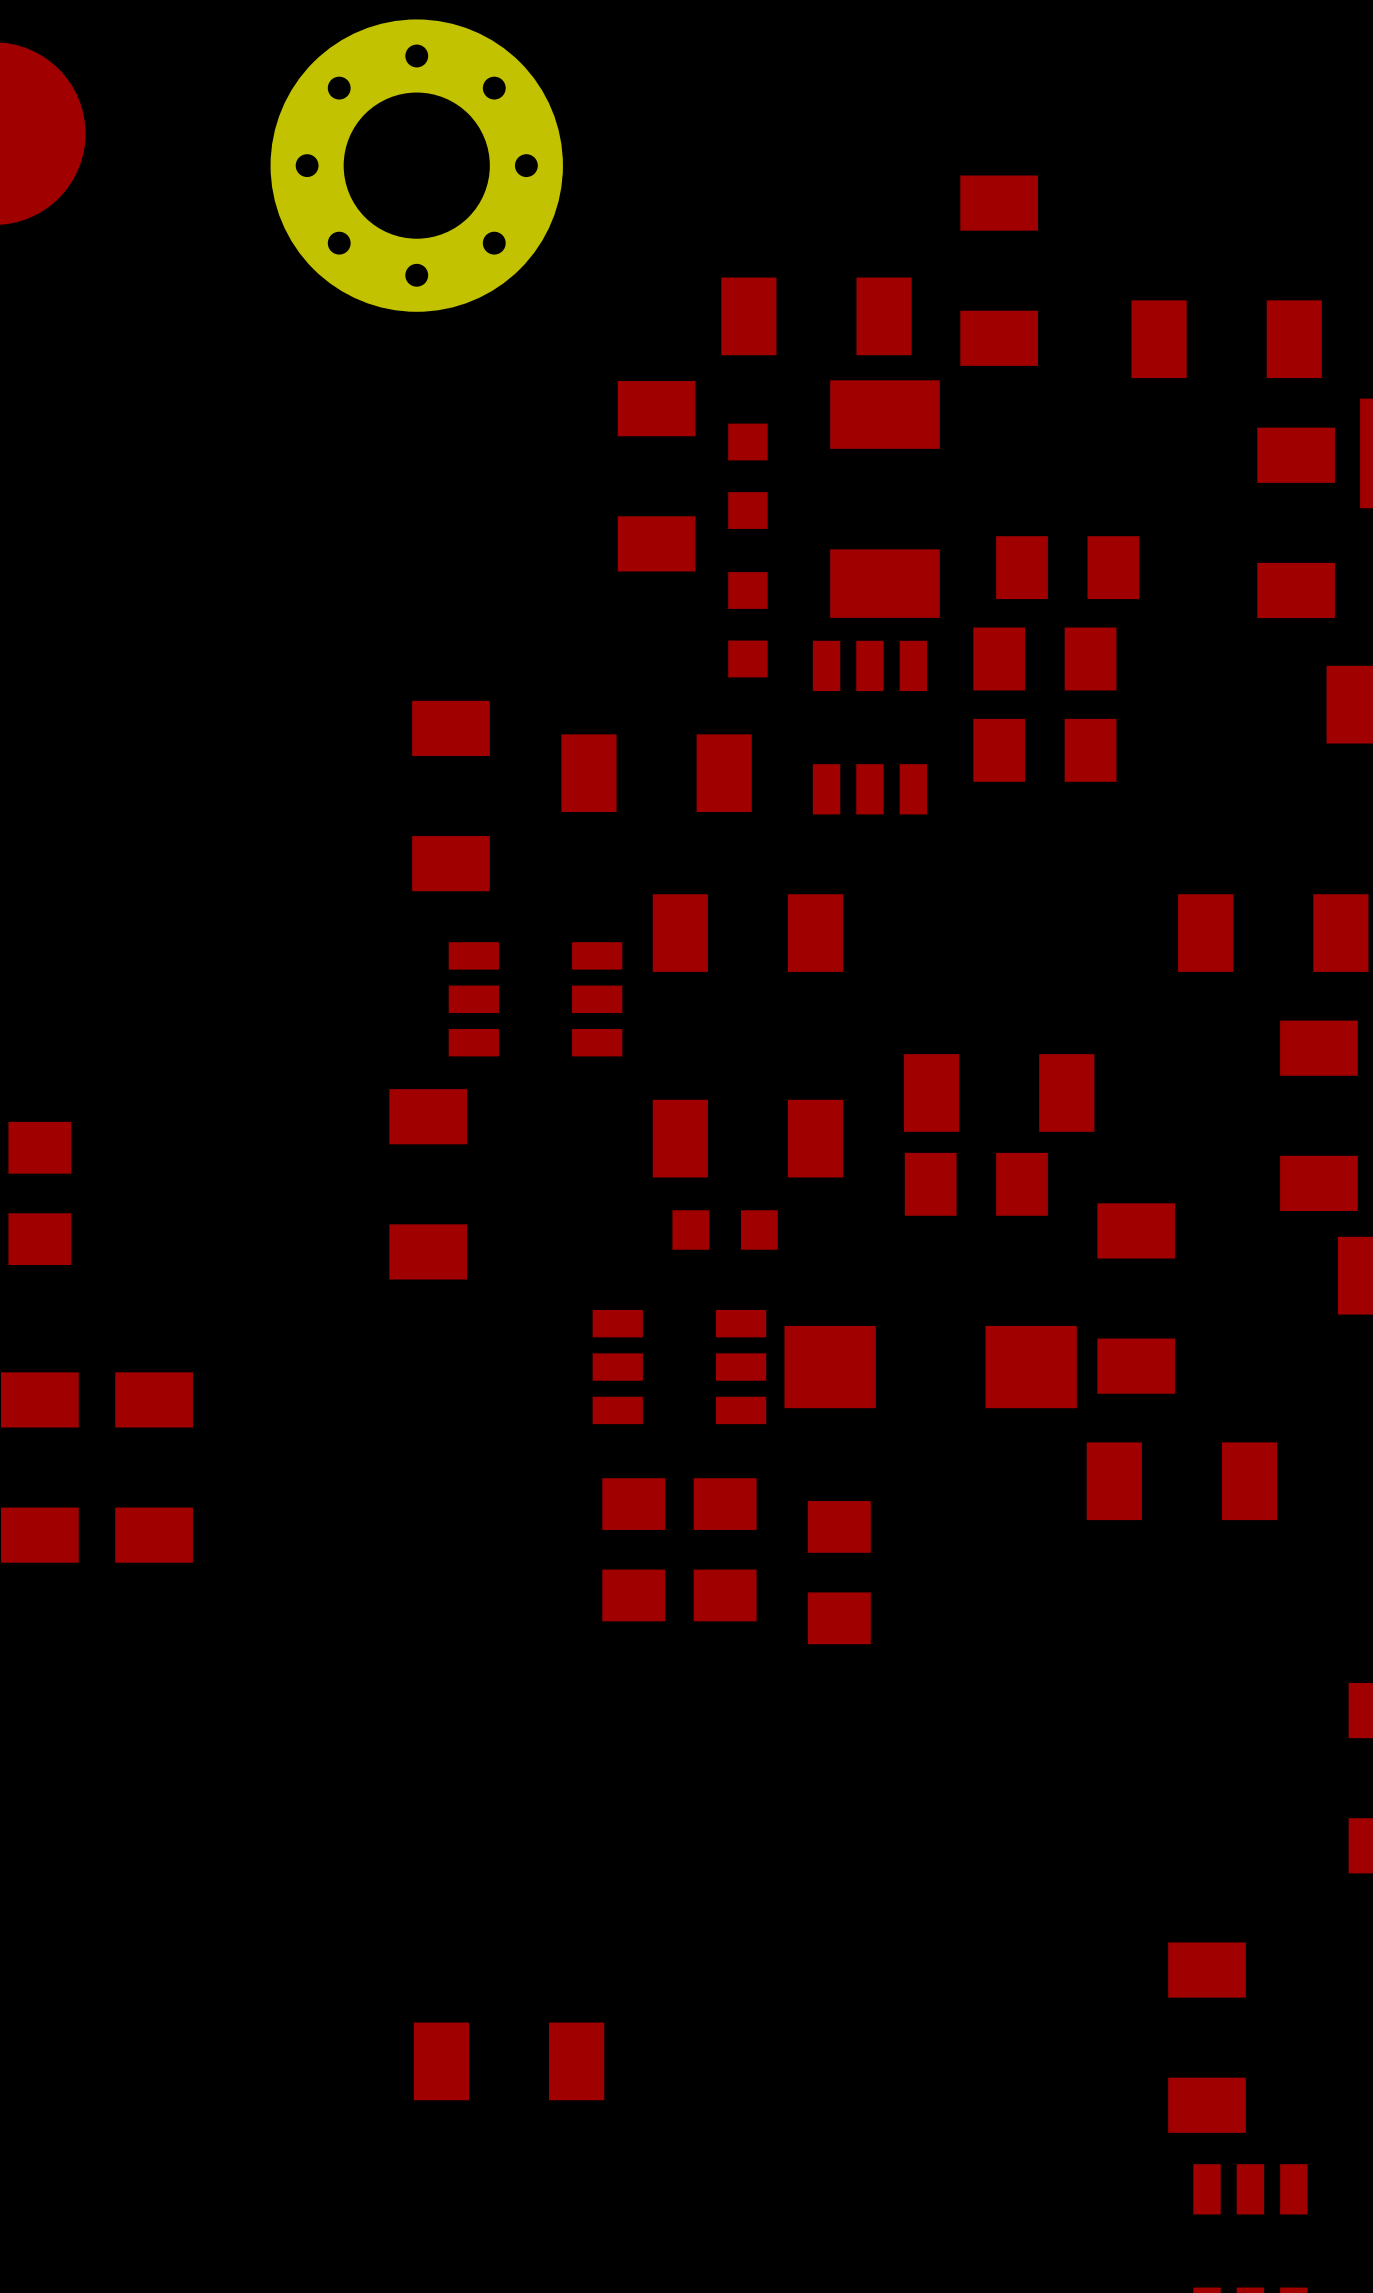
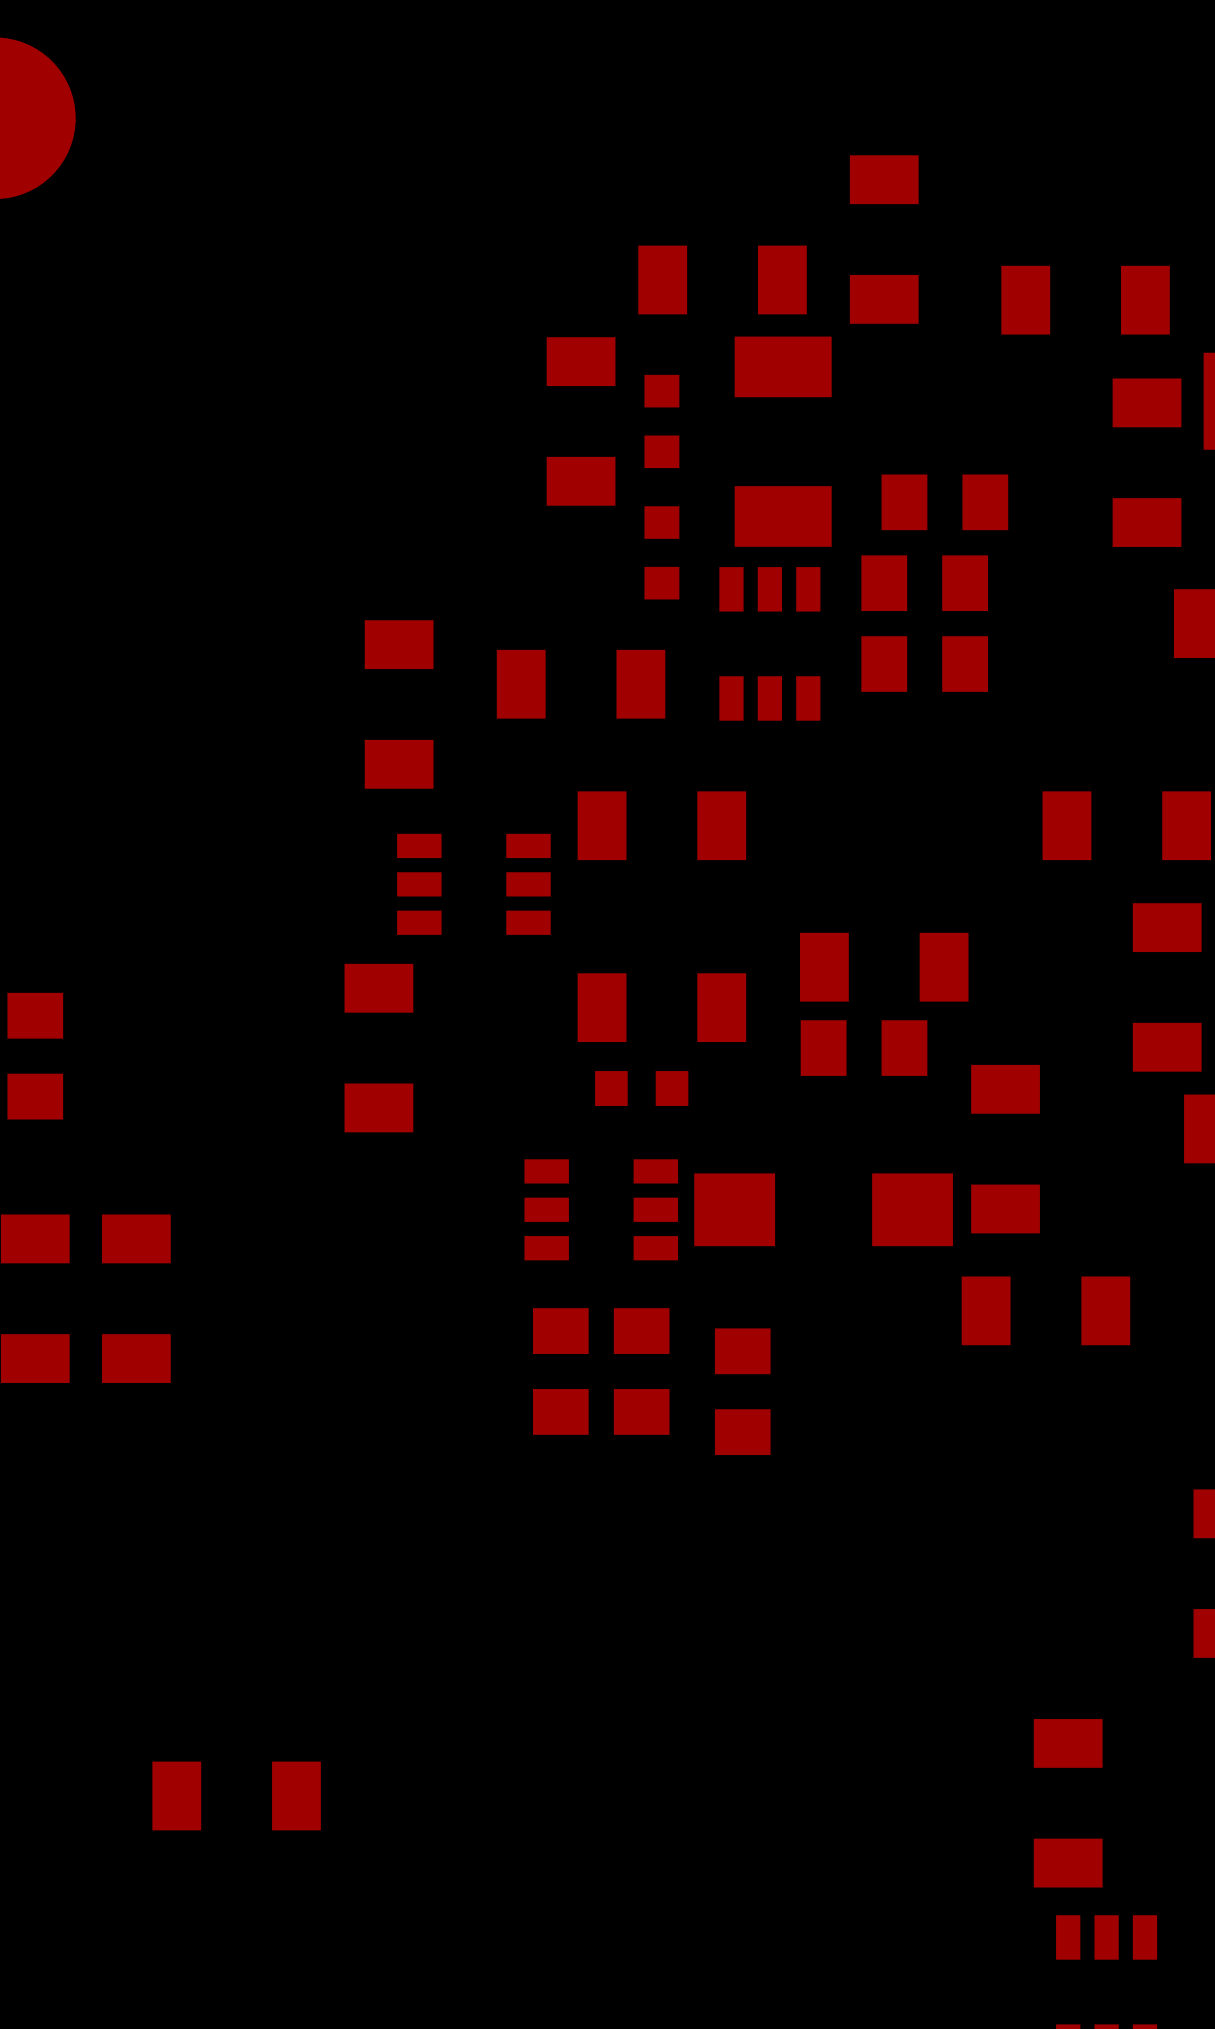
part: (416, 165) -> none
part position: (509, 2061) -> (236, 1795)

